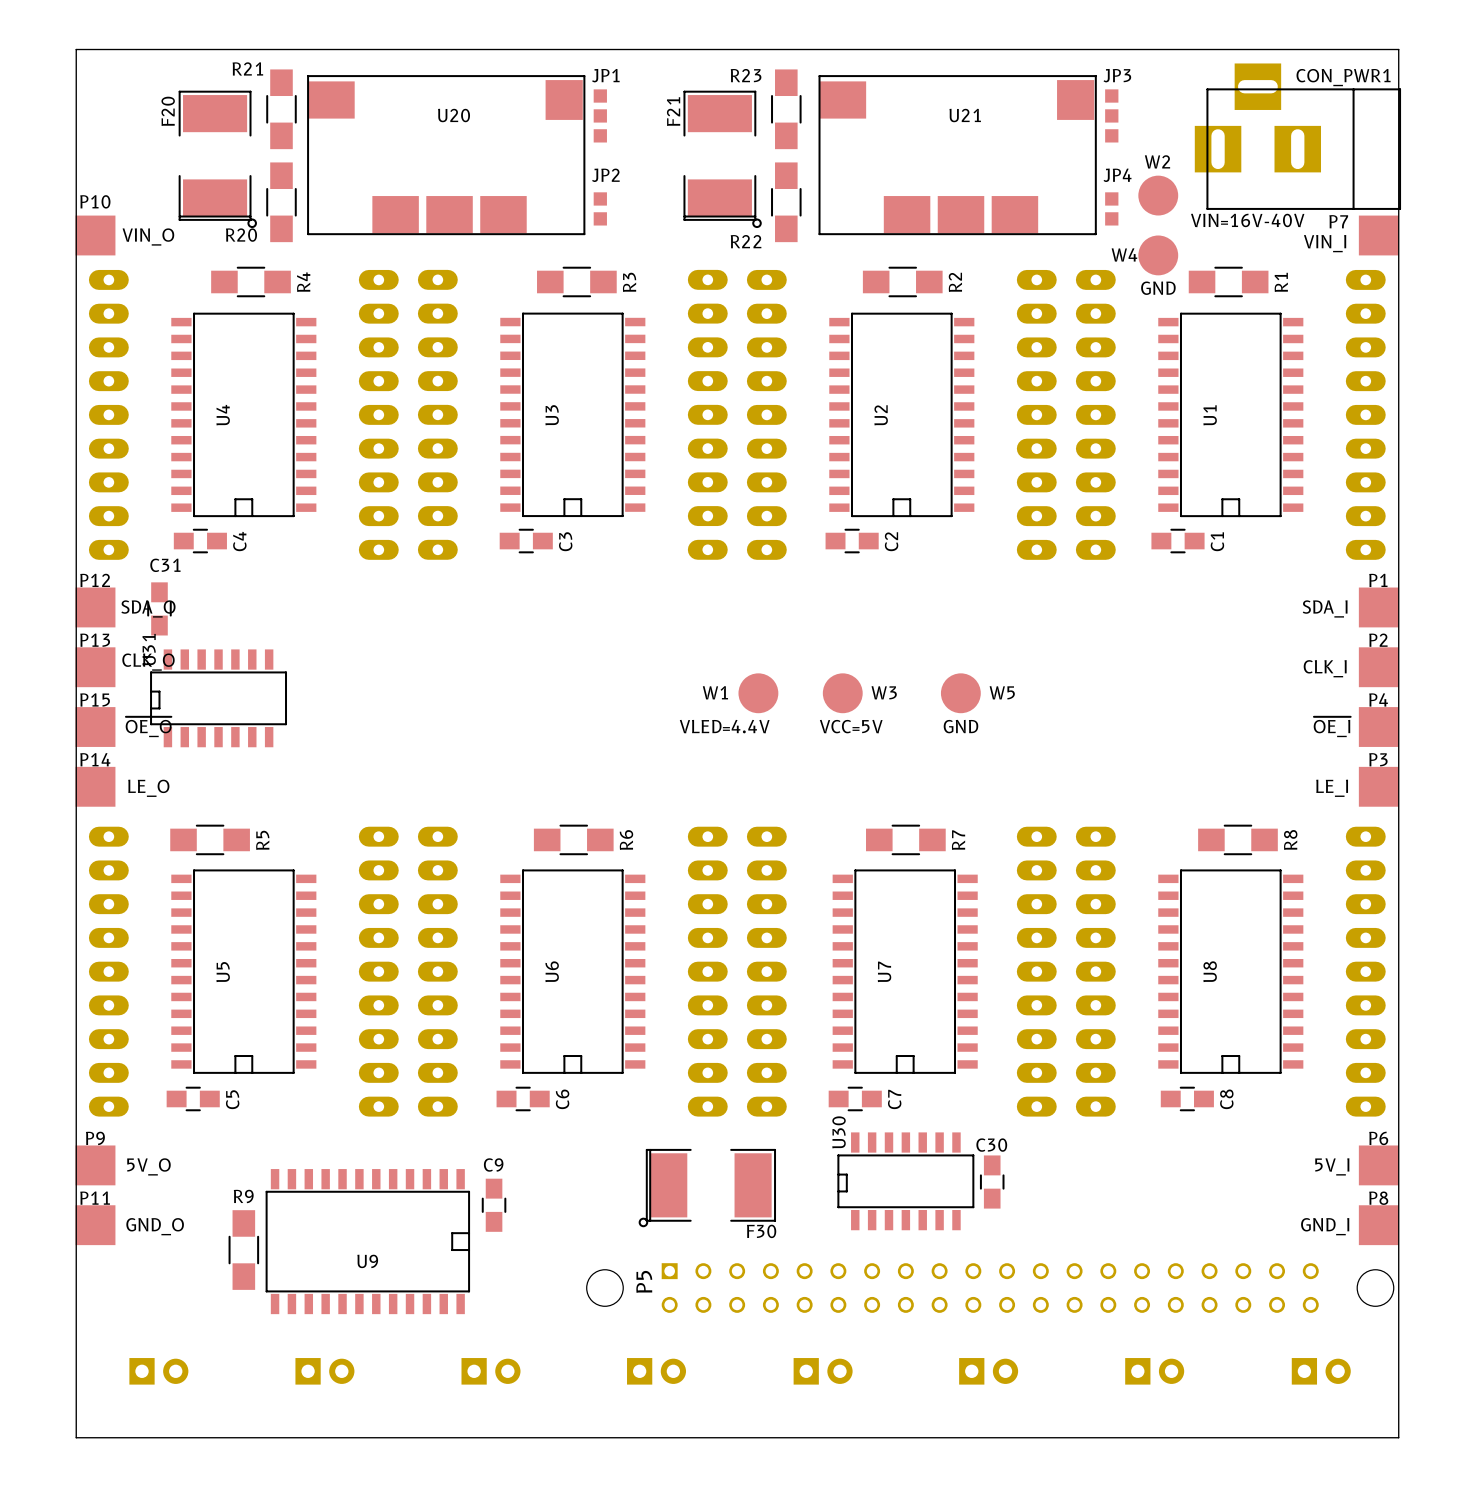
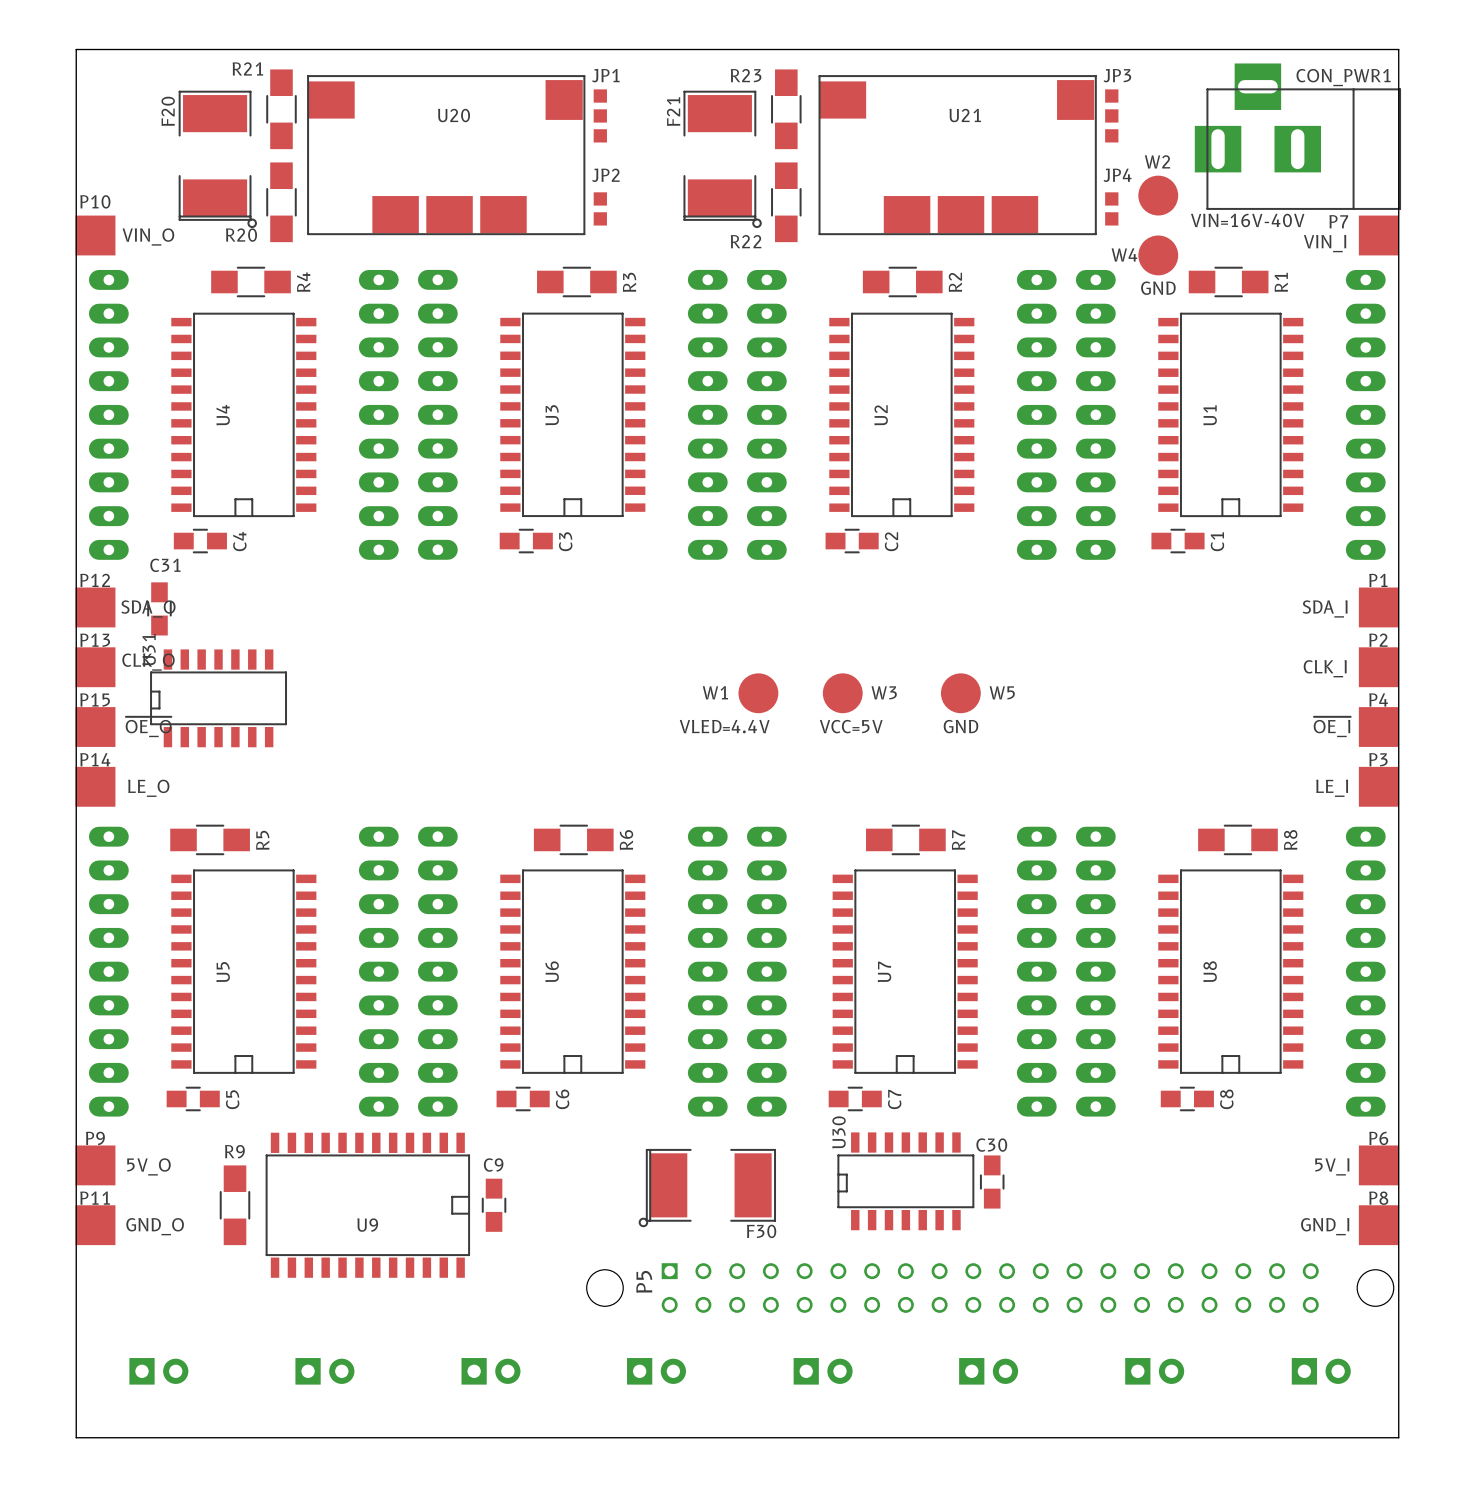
U9 position: (367, 1241) -> (367, 1205)
R9 position: (243, 1250) -> (235, 1205)

